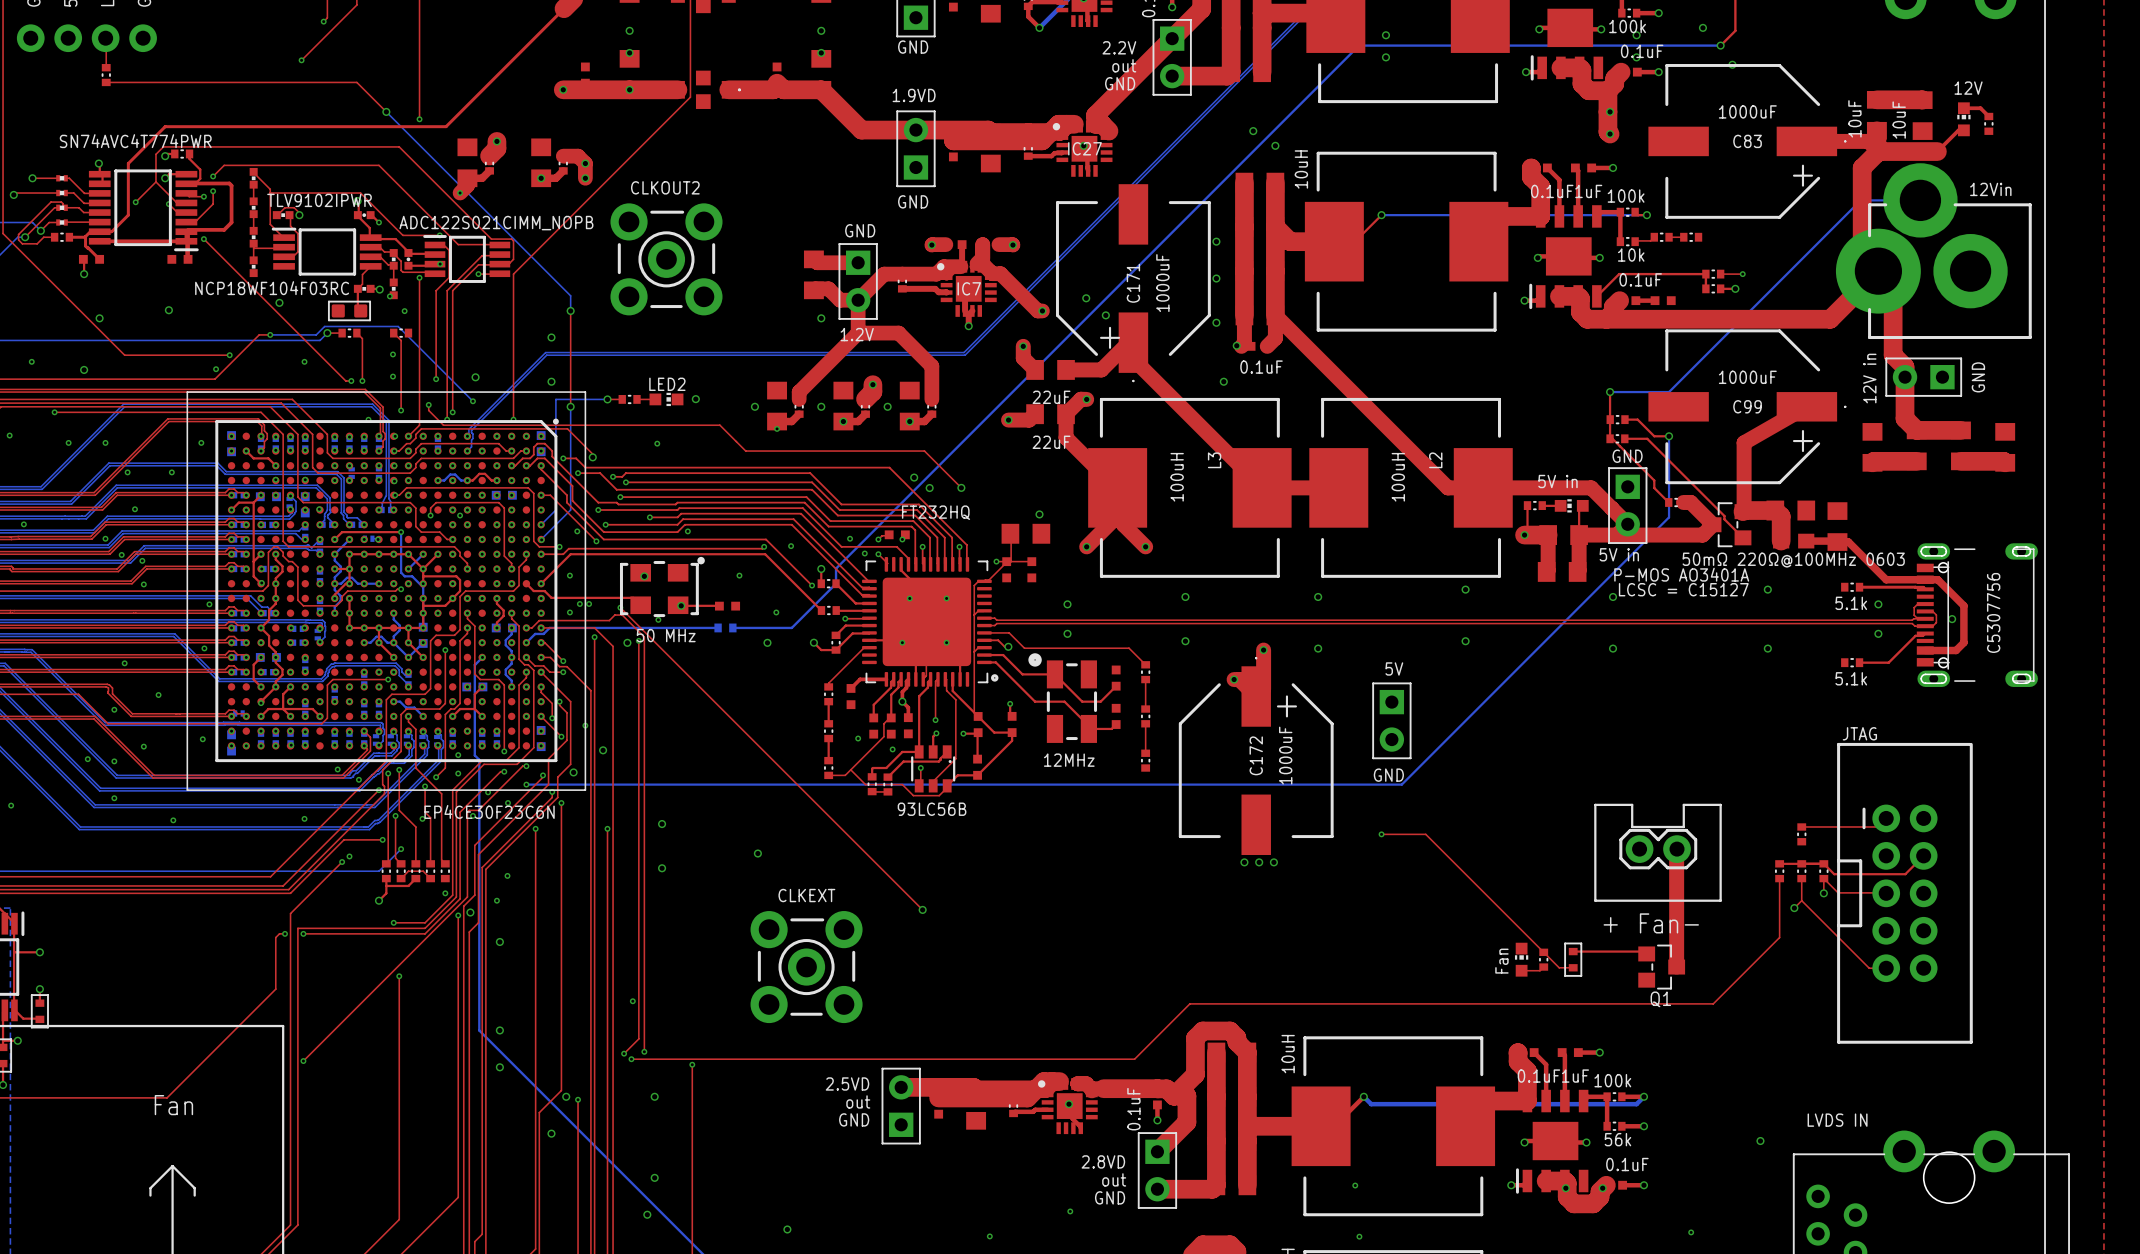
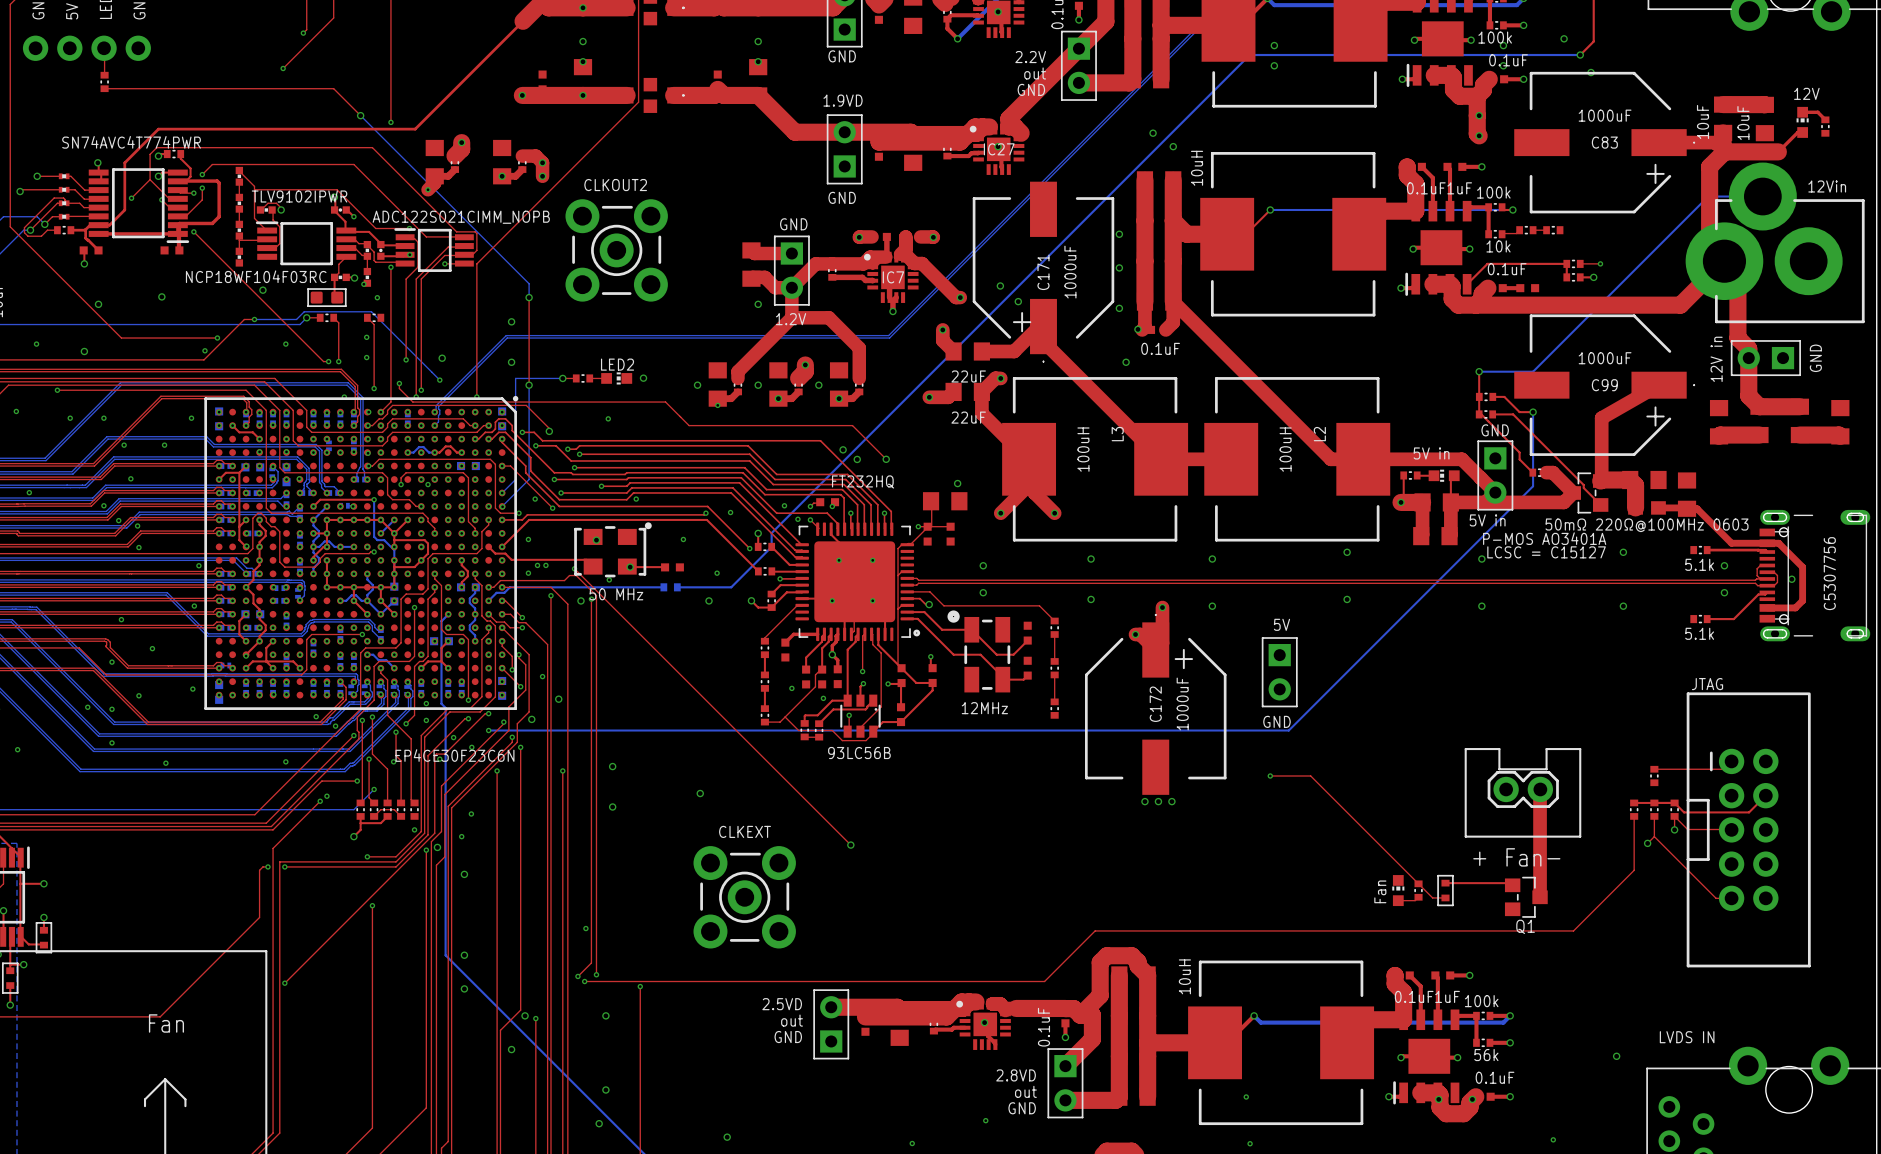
part footprint: [186, 391, 586, 791] -> [204, 395, 519, 710]

